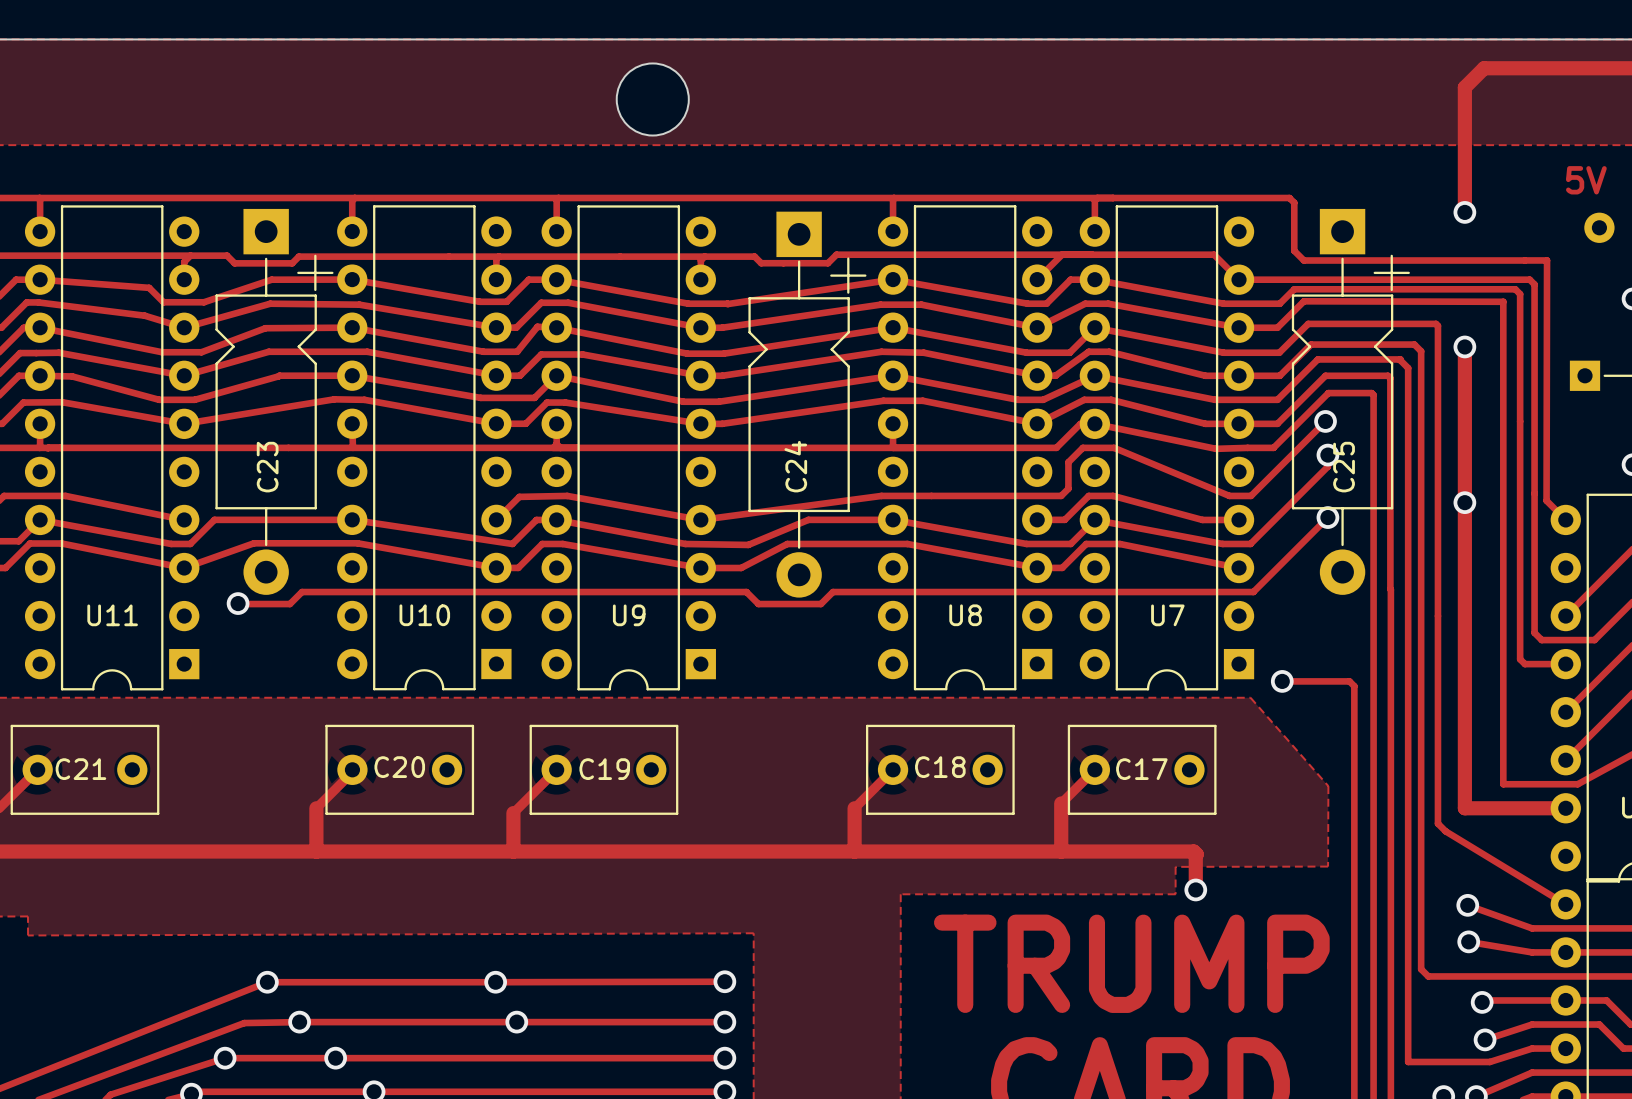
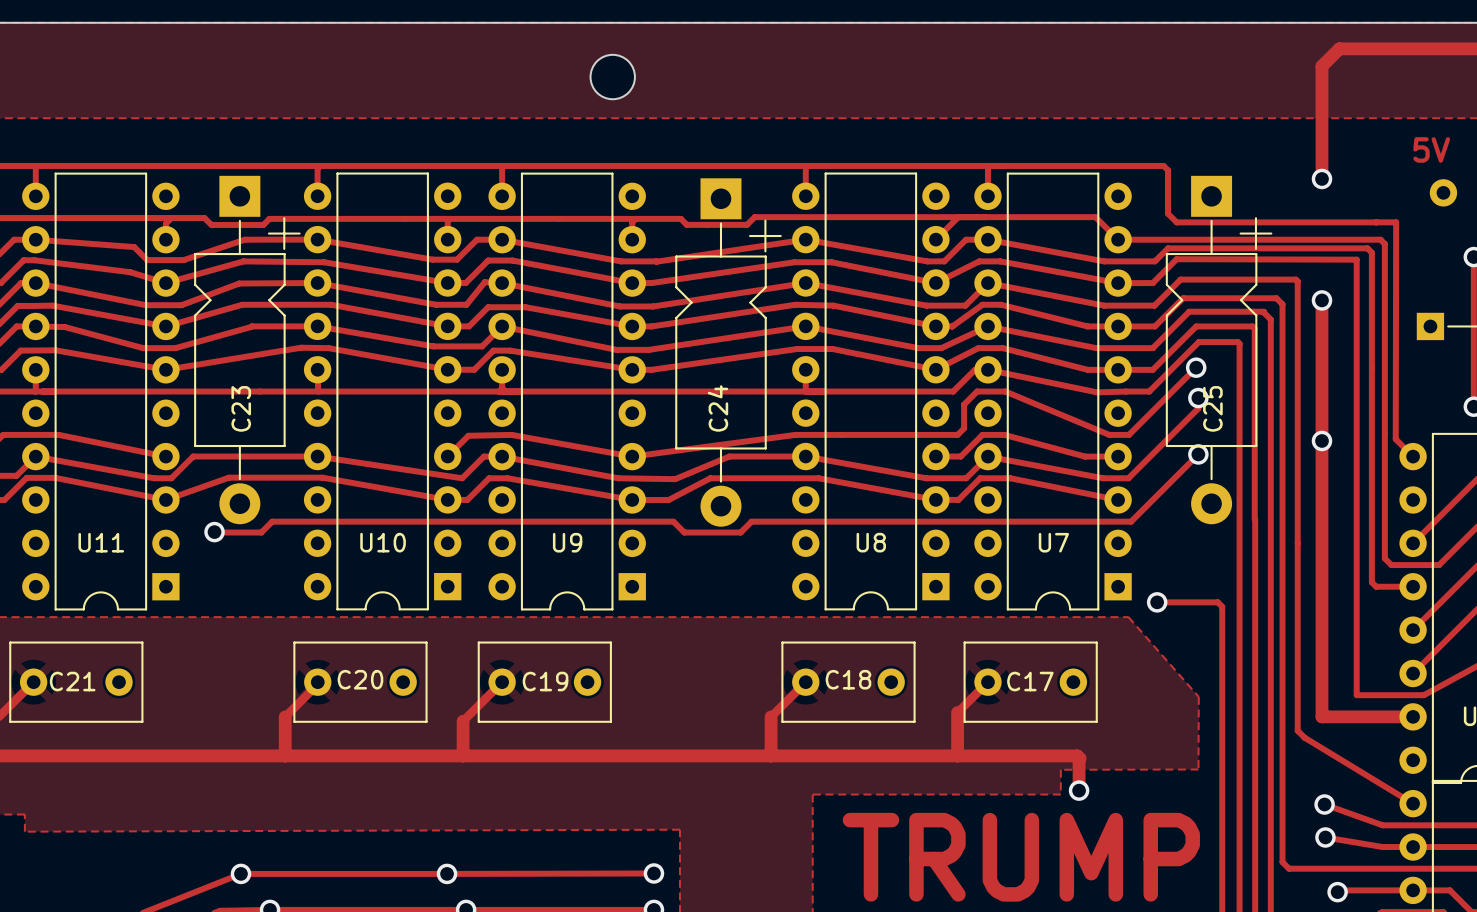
round board edge: [616, 62, 690, 137] -> none
round board edge: none -> [590, 54, 636, 100]

